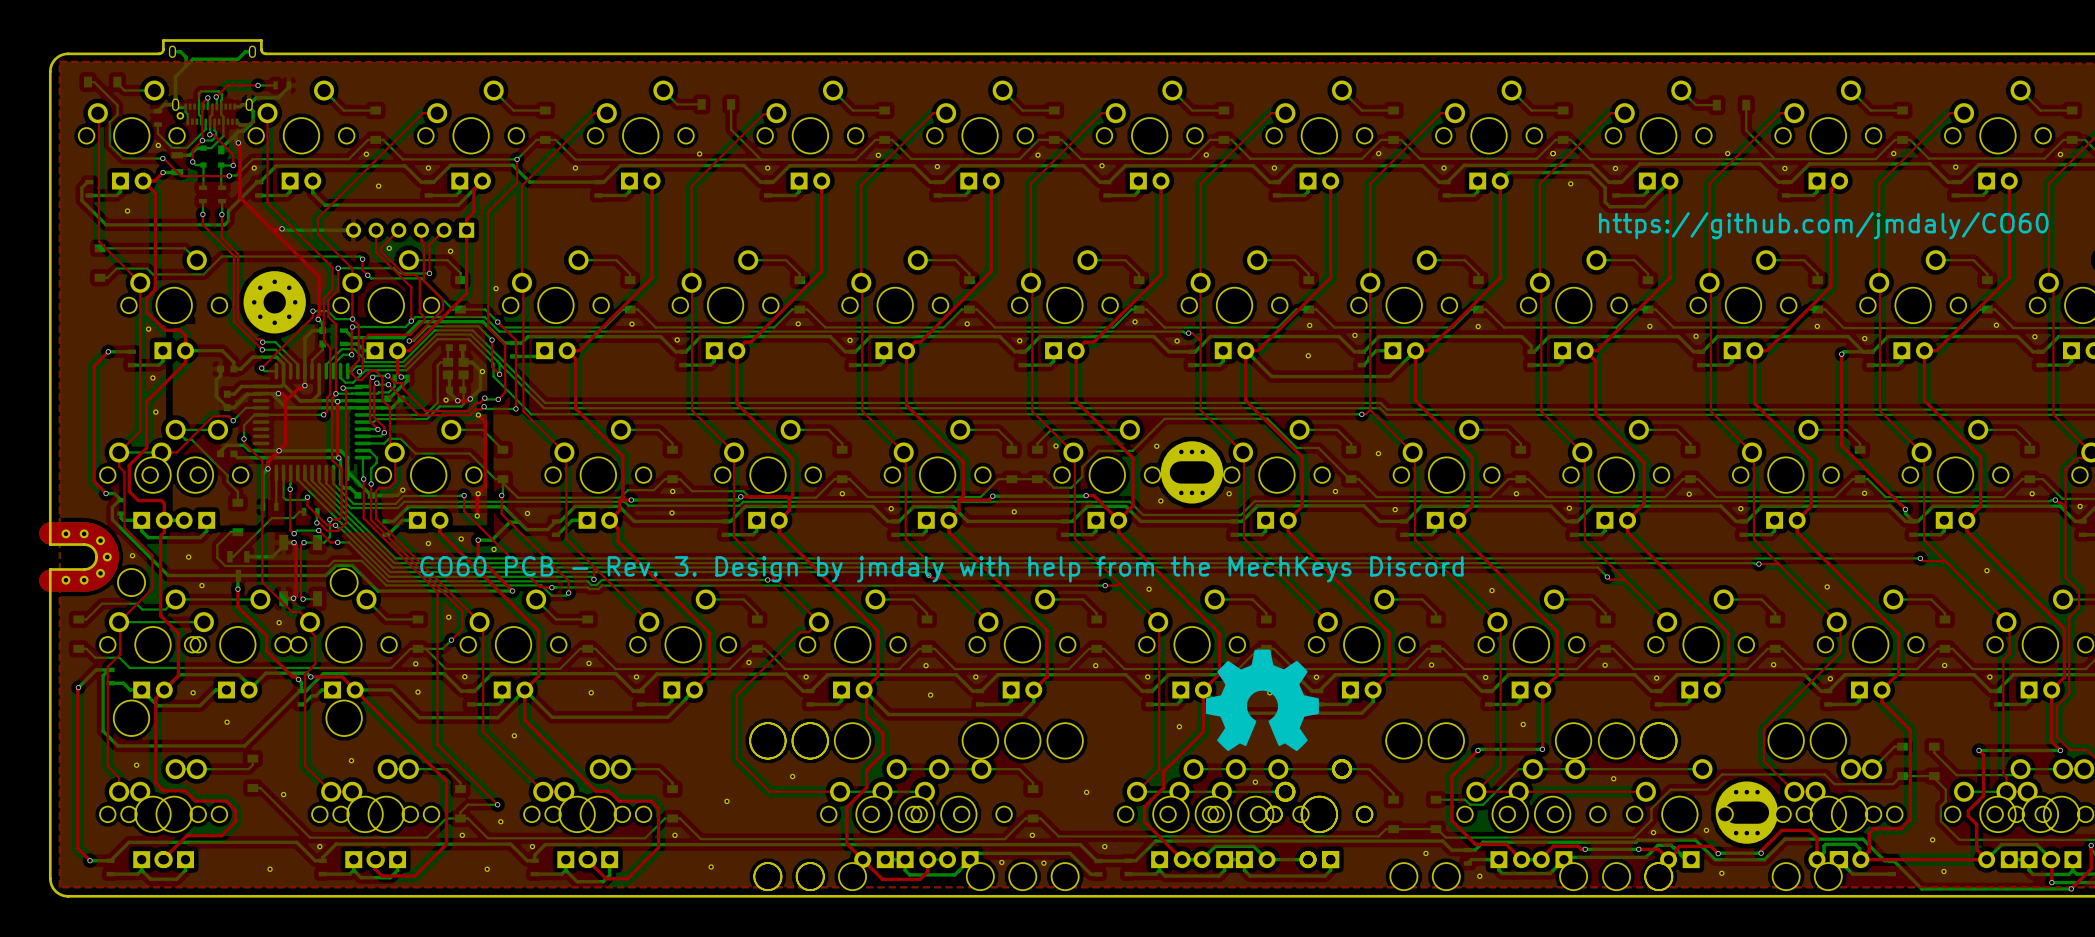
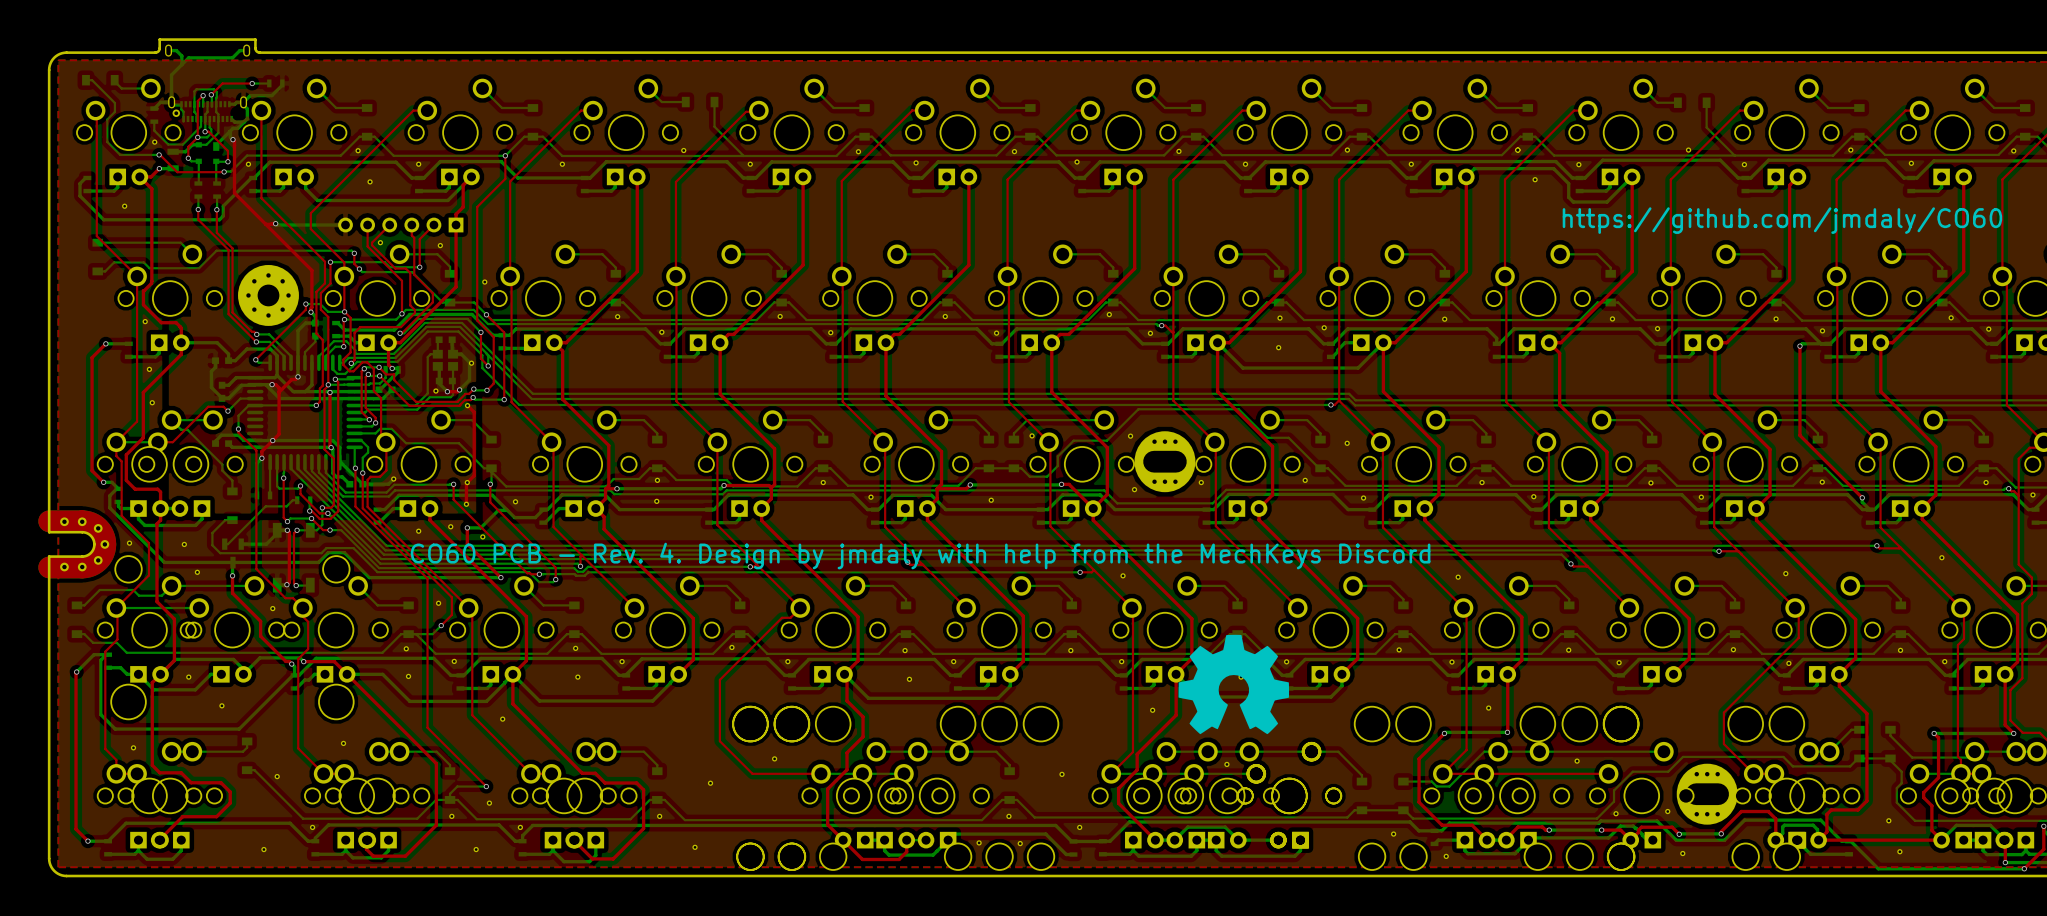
text: CO60 PCB - Rev. 3. Design by jmdaly with help from the MechKeys Discord (941, 569) -> CO60 PCB - Rev. 4. Design by jmdaly with help from the MechKeys Discord (920, 556)

